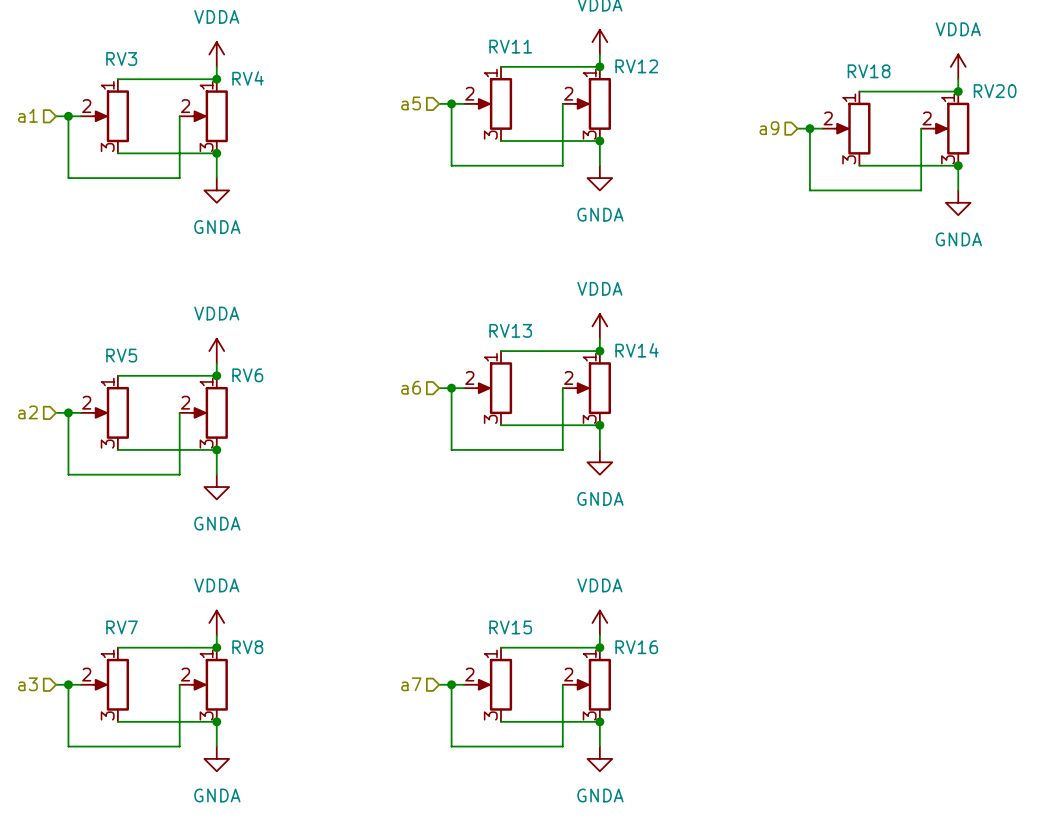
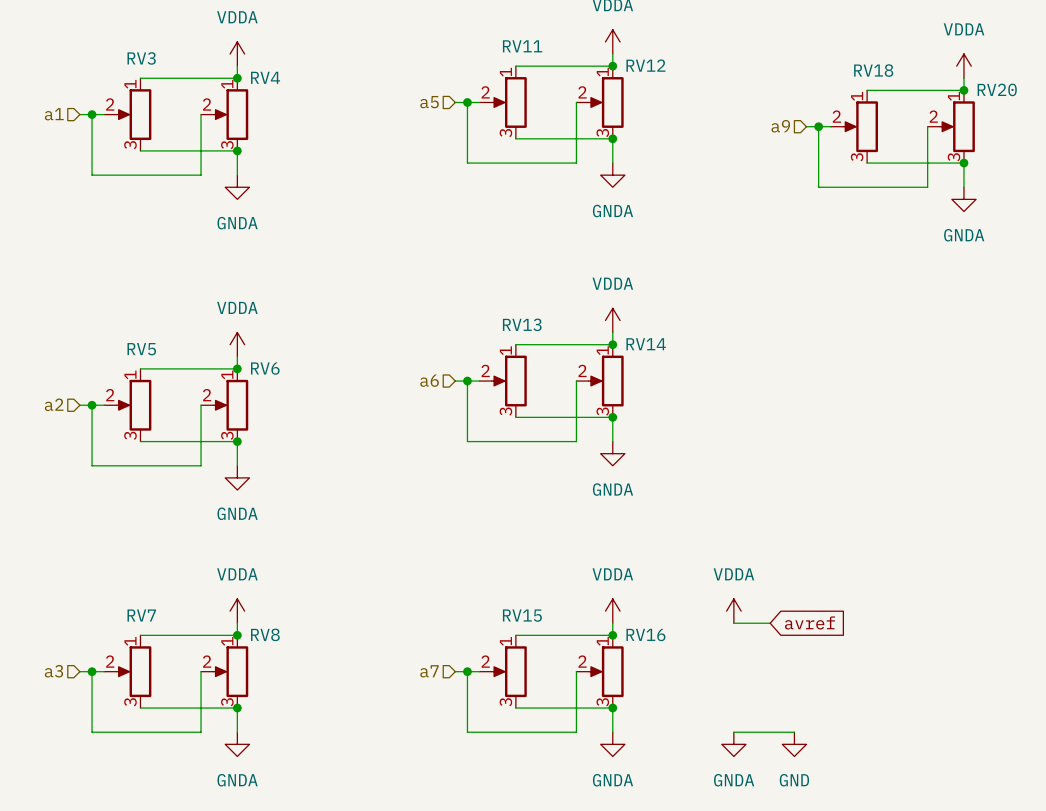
power symbol: none -> VDDA (733, 611)
wire: none -> (733, 623) (770, 623)
global label: none -> avref (809, 622)
wire: none -> (733, 732) (794, 732)
power symbol: none -> GNDA (733, 744)
power symbol: none -> GND (794, 744)

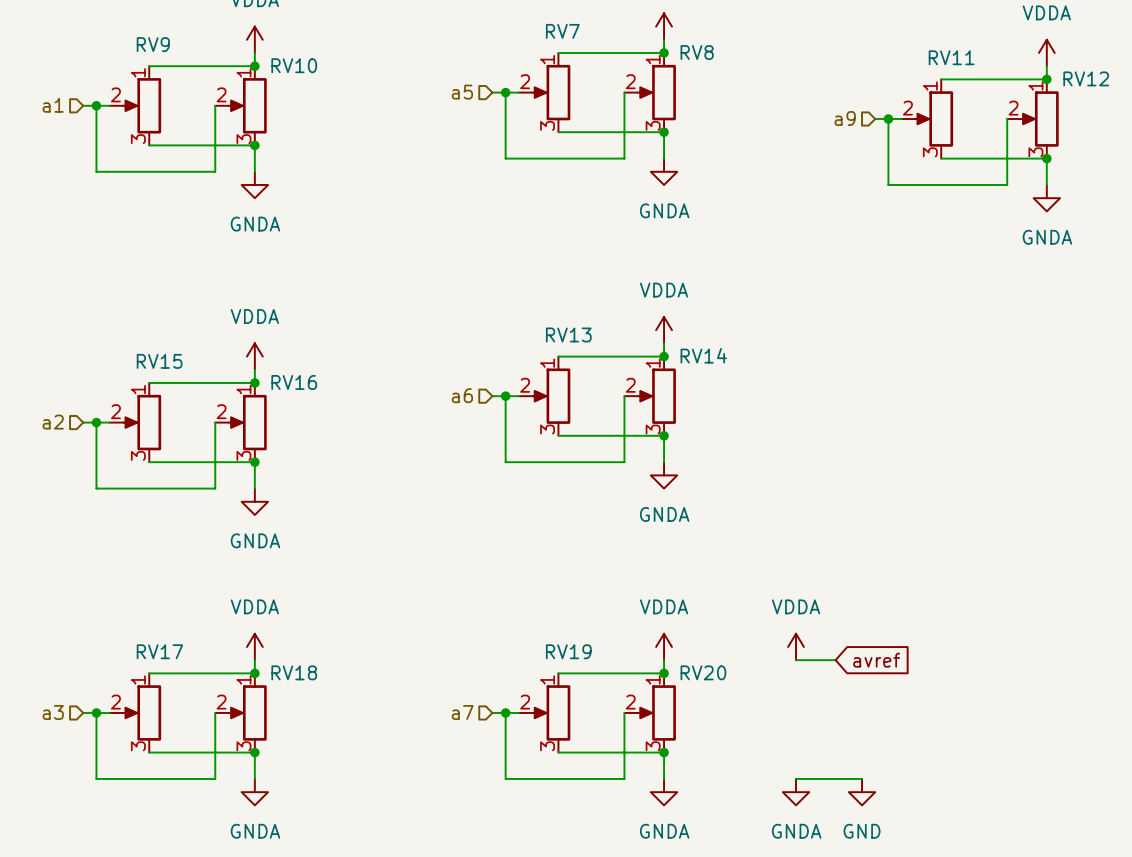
RV11 name: RV11 (522, 46) -> RV7 (562, 31)
RV3 name: RV3 (141, 58) -> RV9 (153, 44)
RV12 name: RV12 (645, 65) -> RV8 (697, 52)
RV18 name: RV18 (873, 70) -> RV11 (951, 57)
RV4 name: RV4 (265, 77) -> RV10 (294, 65)
RV20 name: RV20 (997, 89) -> RV12 (1086, 78)
RV5 name: RV5 (141, 349) -> RV15 (159, 361)
RV6 name: RV6 (265, 368) -> RV16 (294, 382)
RV7 name: RV7 (141, 615) -> RV17 (159, 651)
RV15 name: RV15 (522, 615) -> RV19 (568, 651)
RV8 name: RV8 (265, 634) -> RV18 (294, 672)
RV16 name: RV16 (645, 635) -> RV20 (703, 672)

